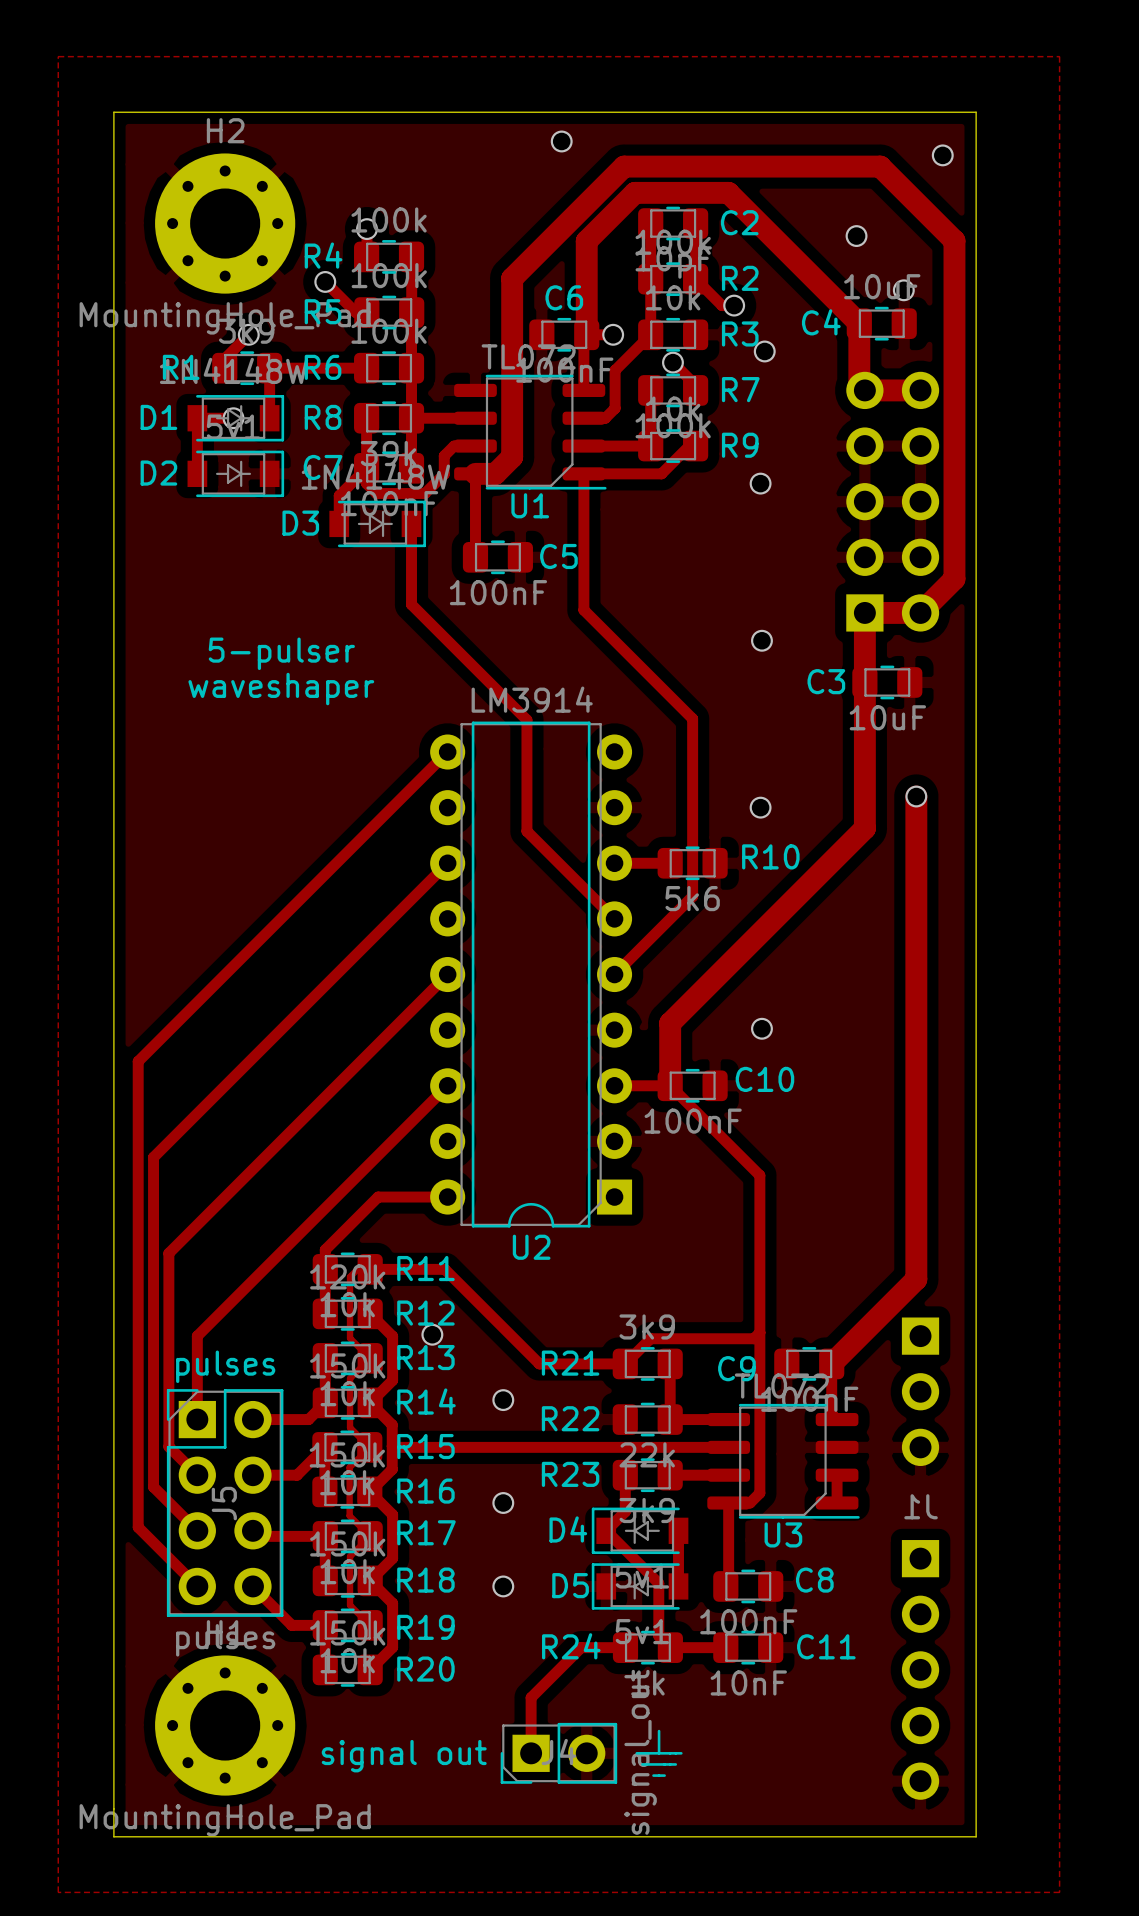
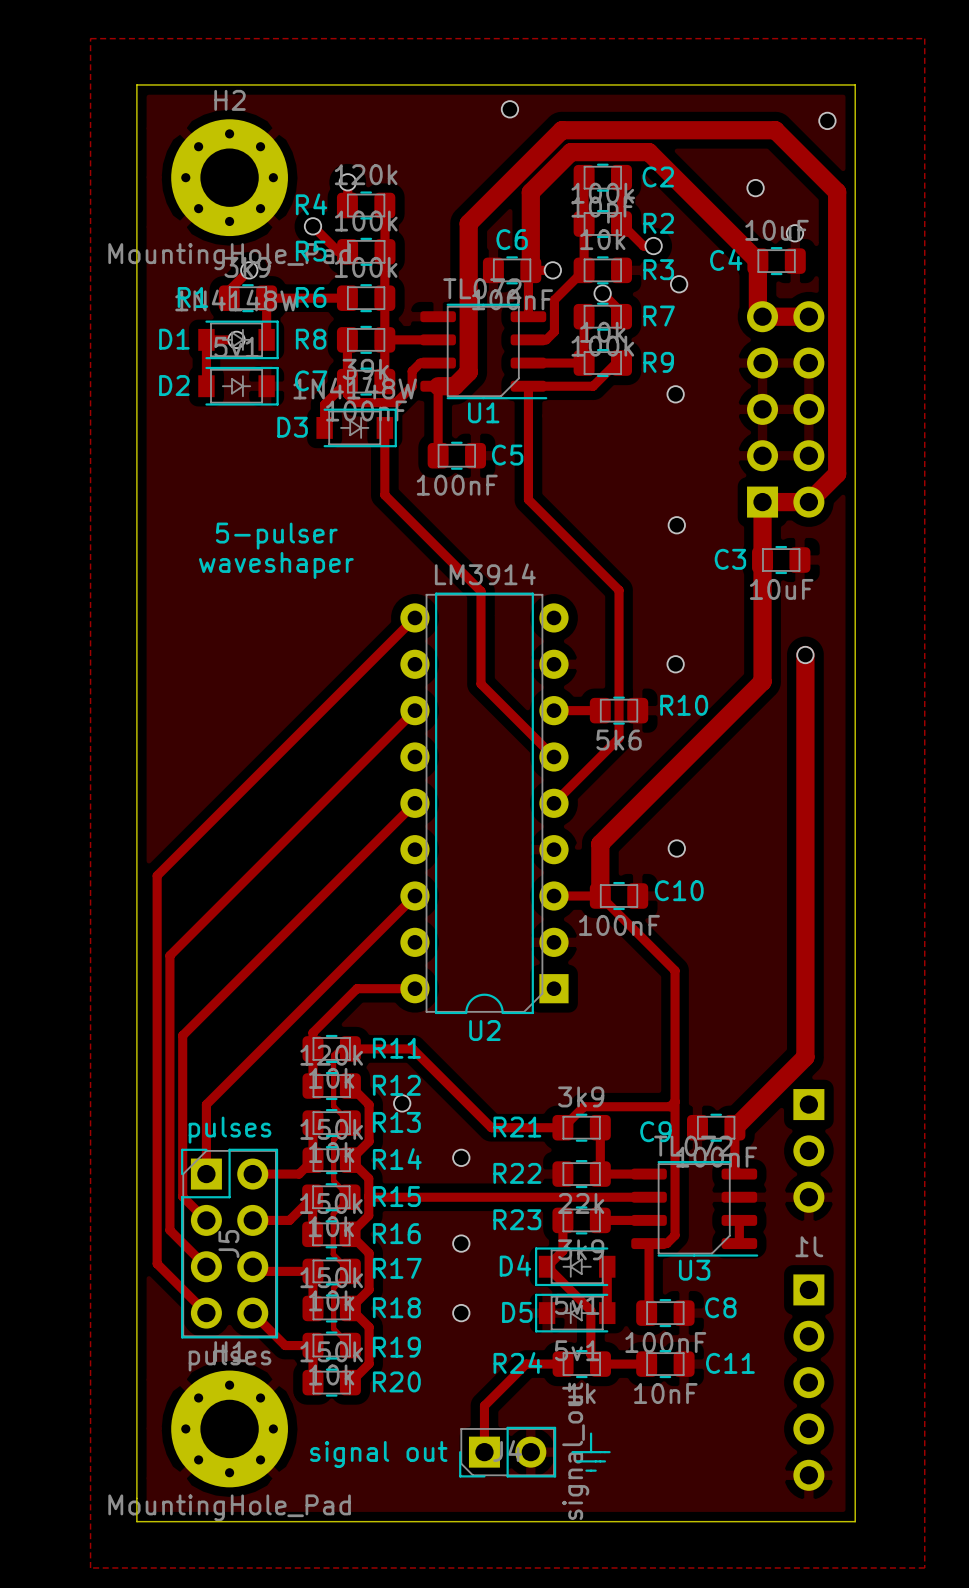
R4 value: 100k (389, 219) -> 120k (366, 174)

